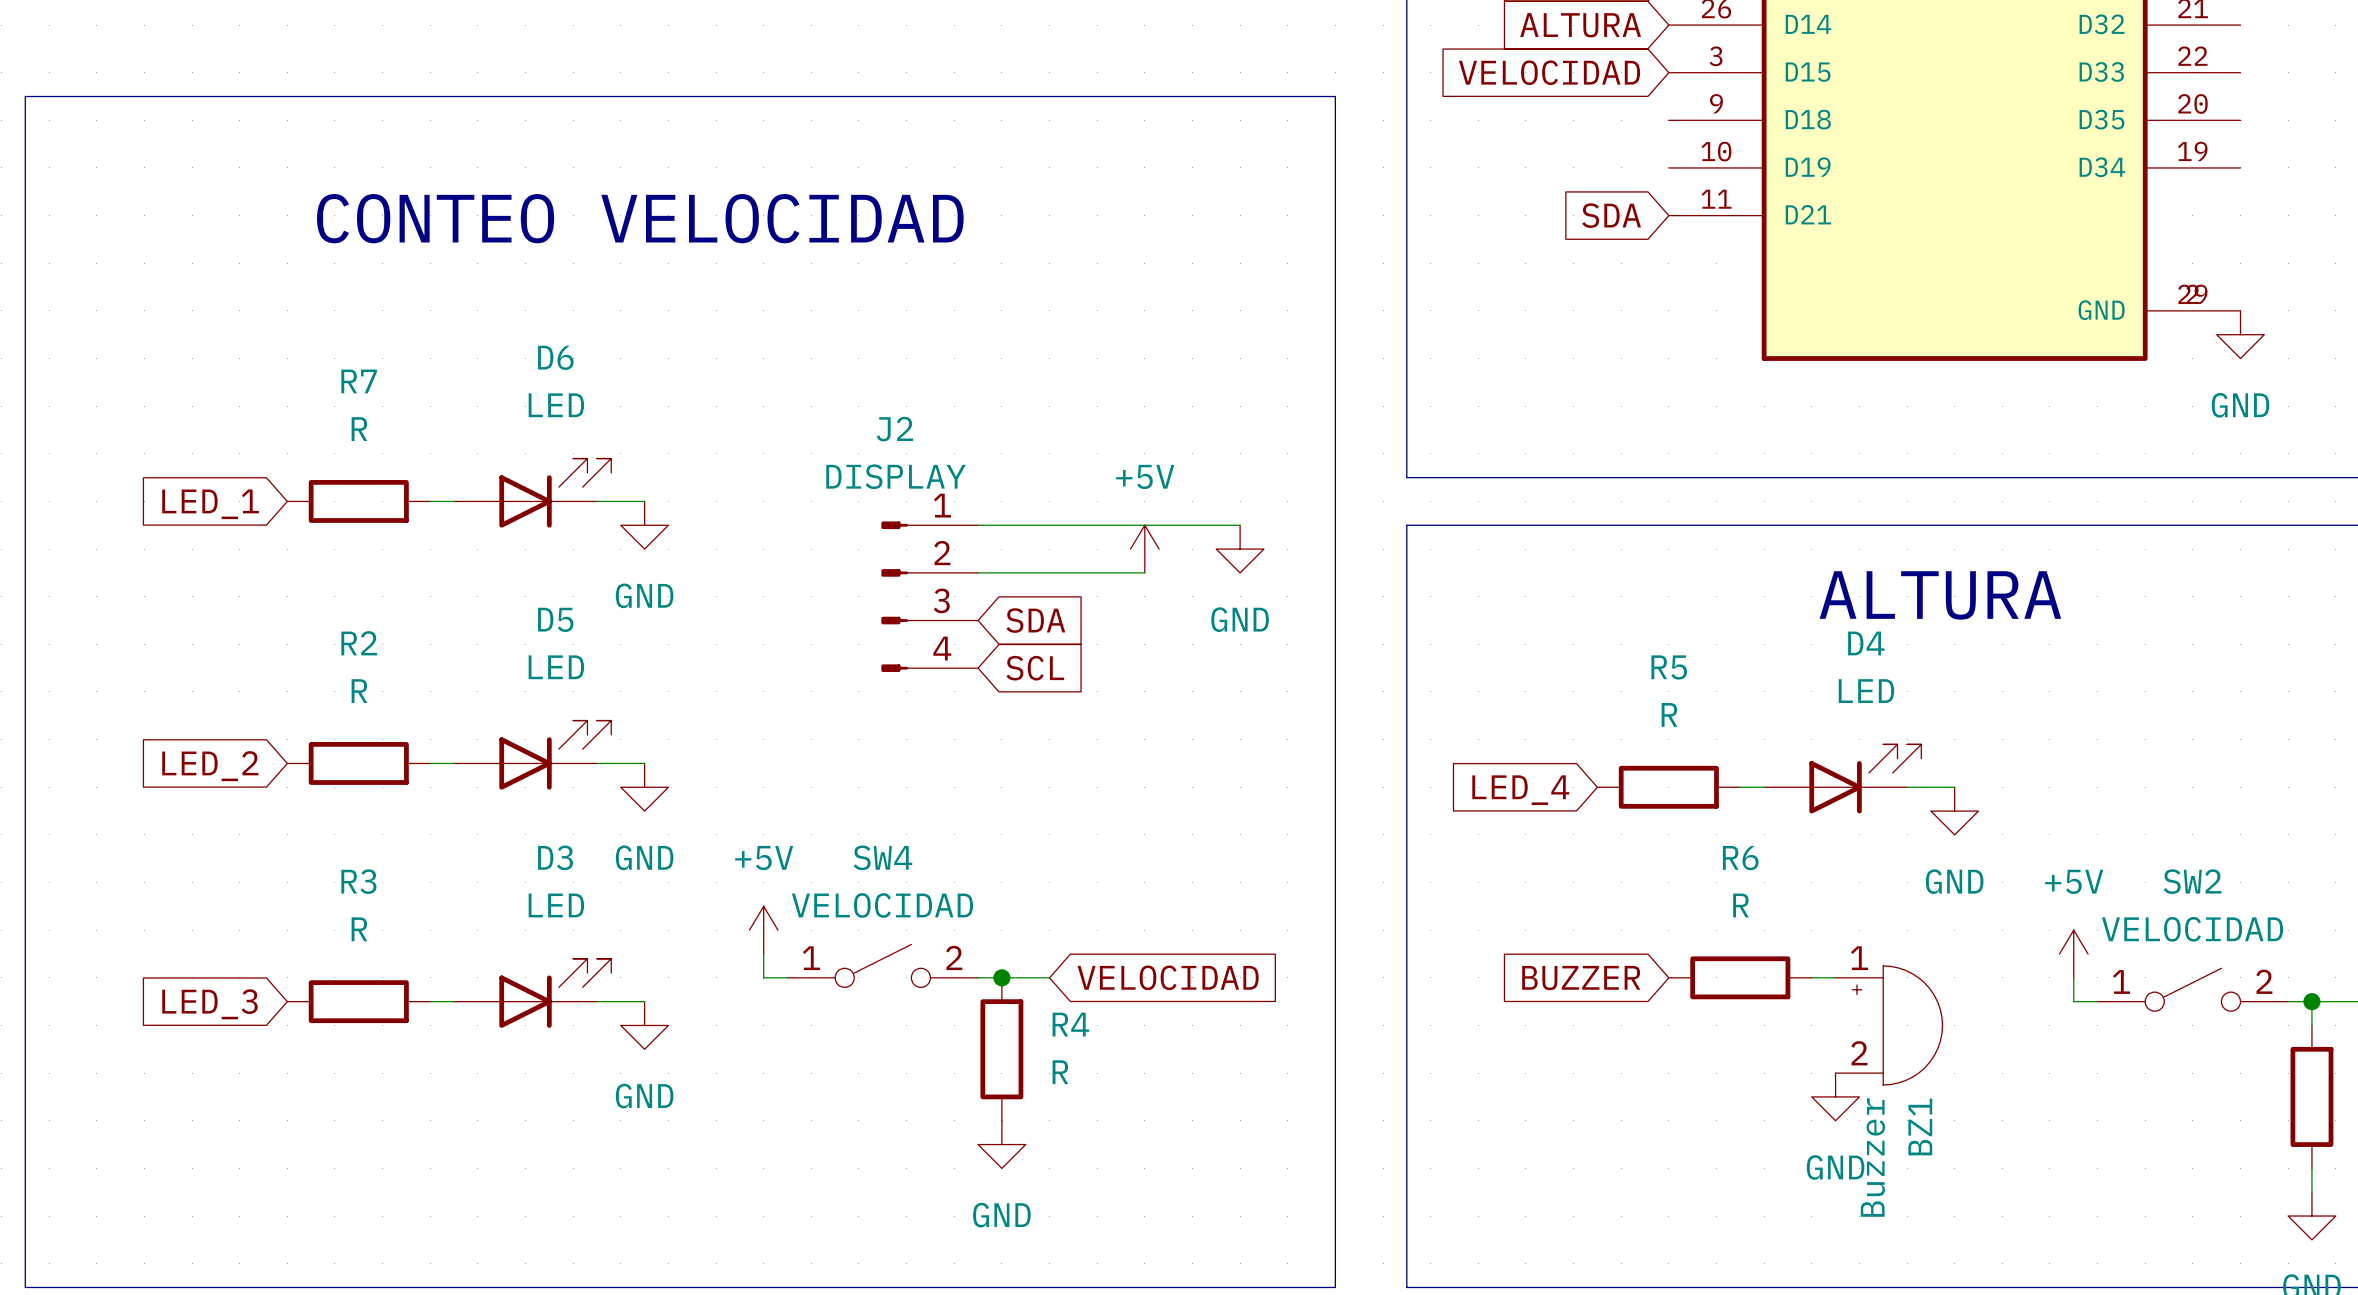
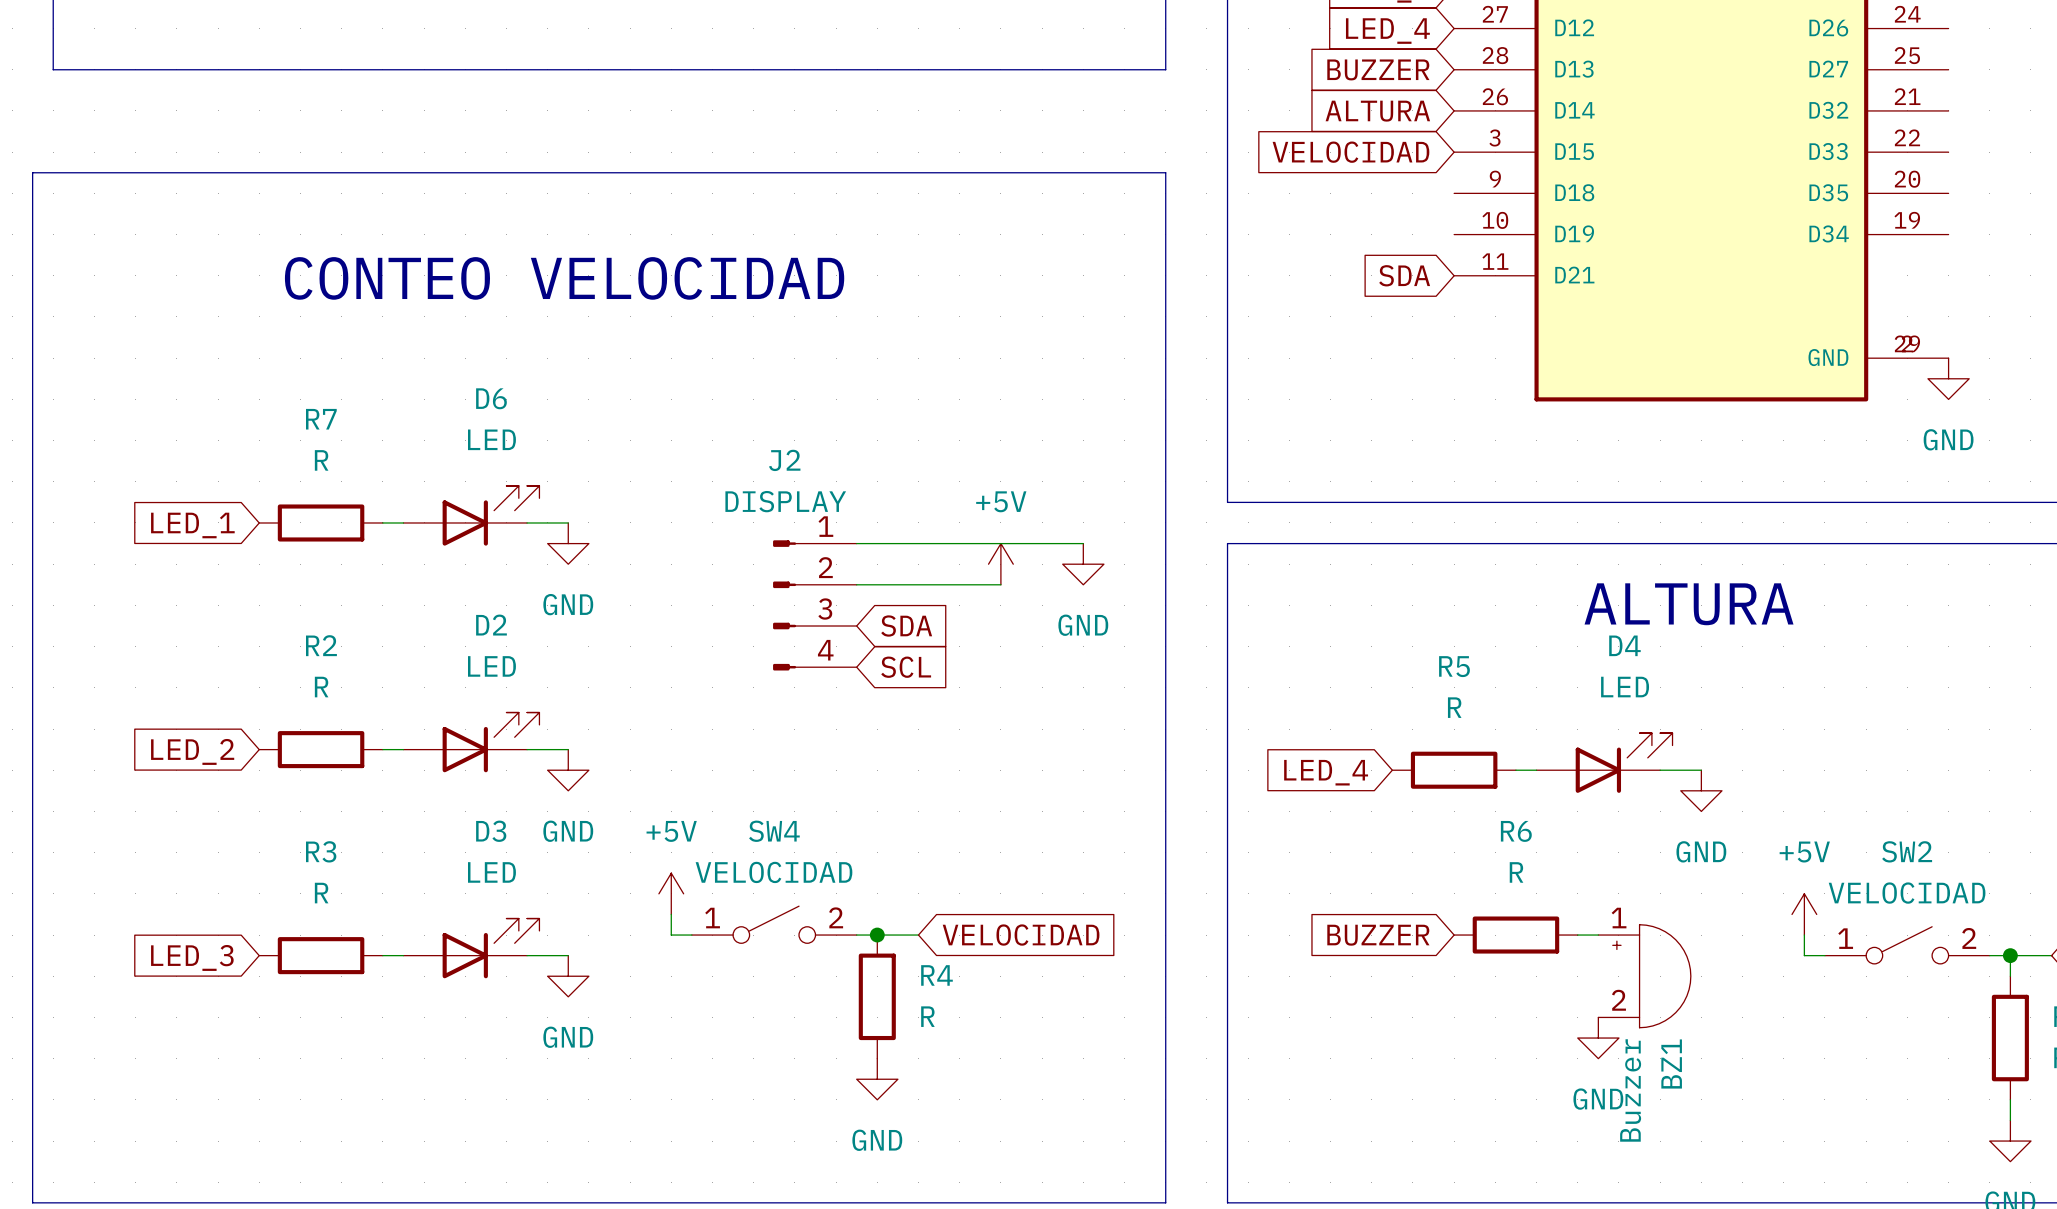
D5 name: D5 (555, 619) -> D2 (491, 625)

